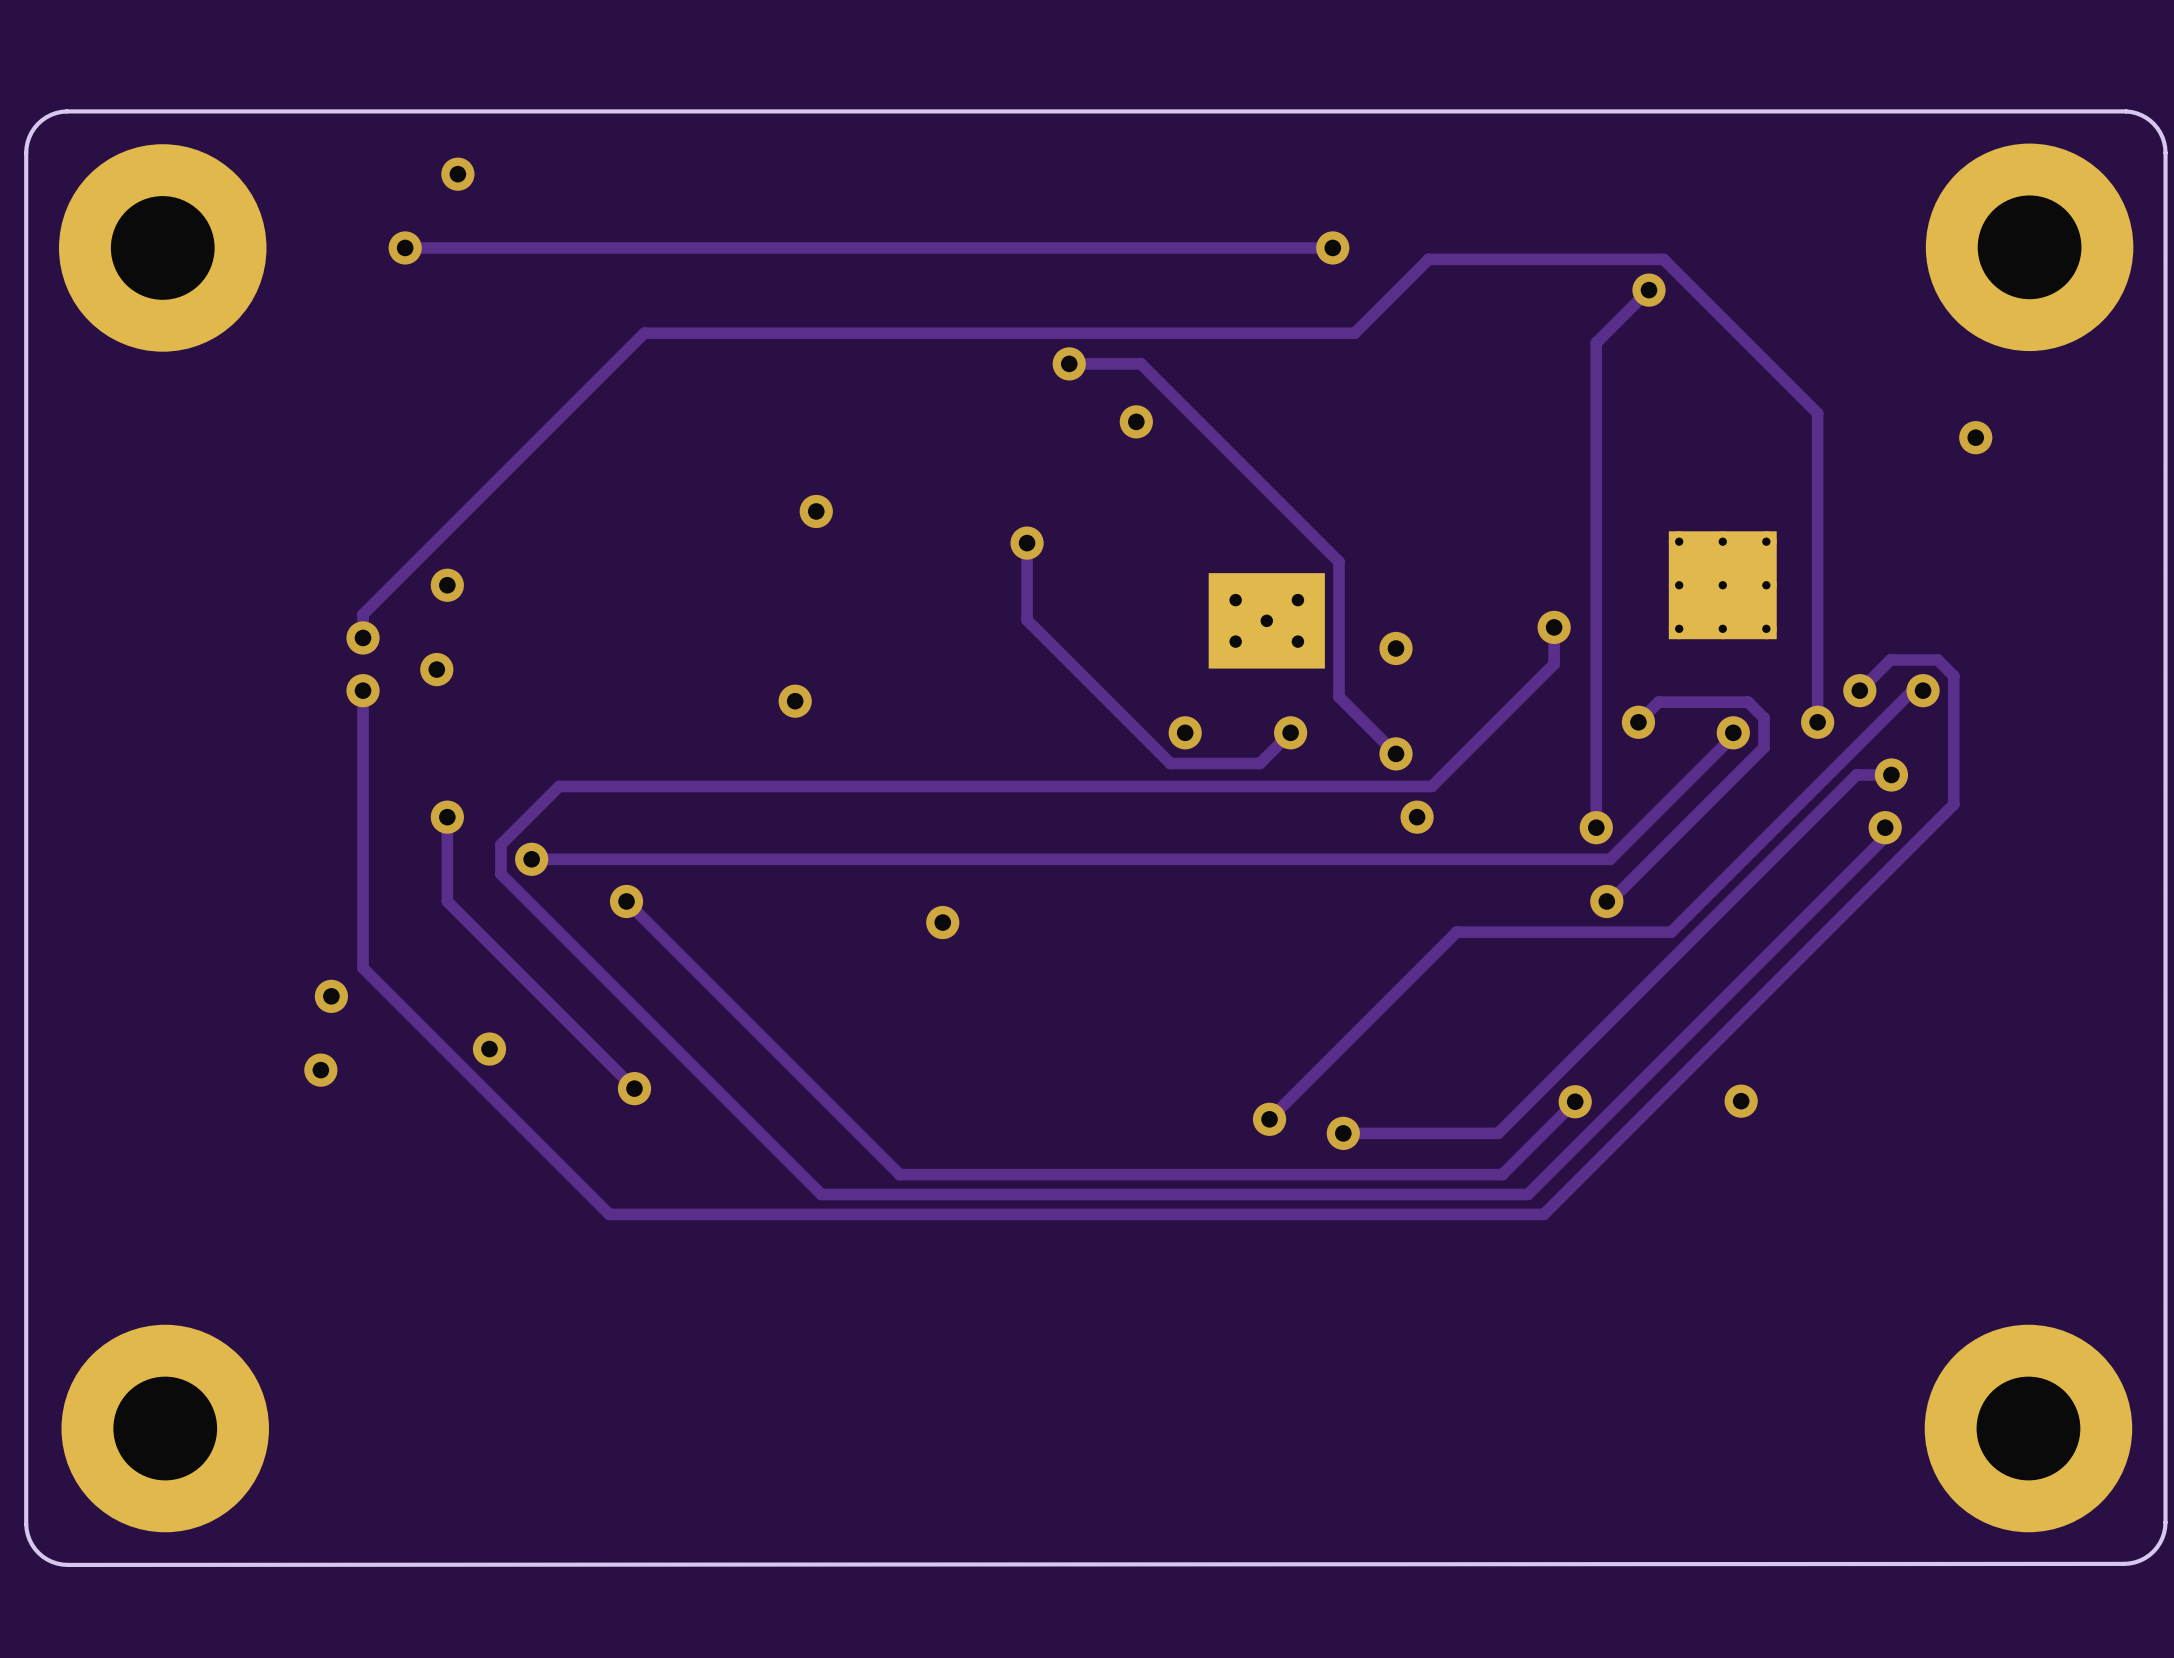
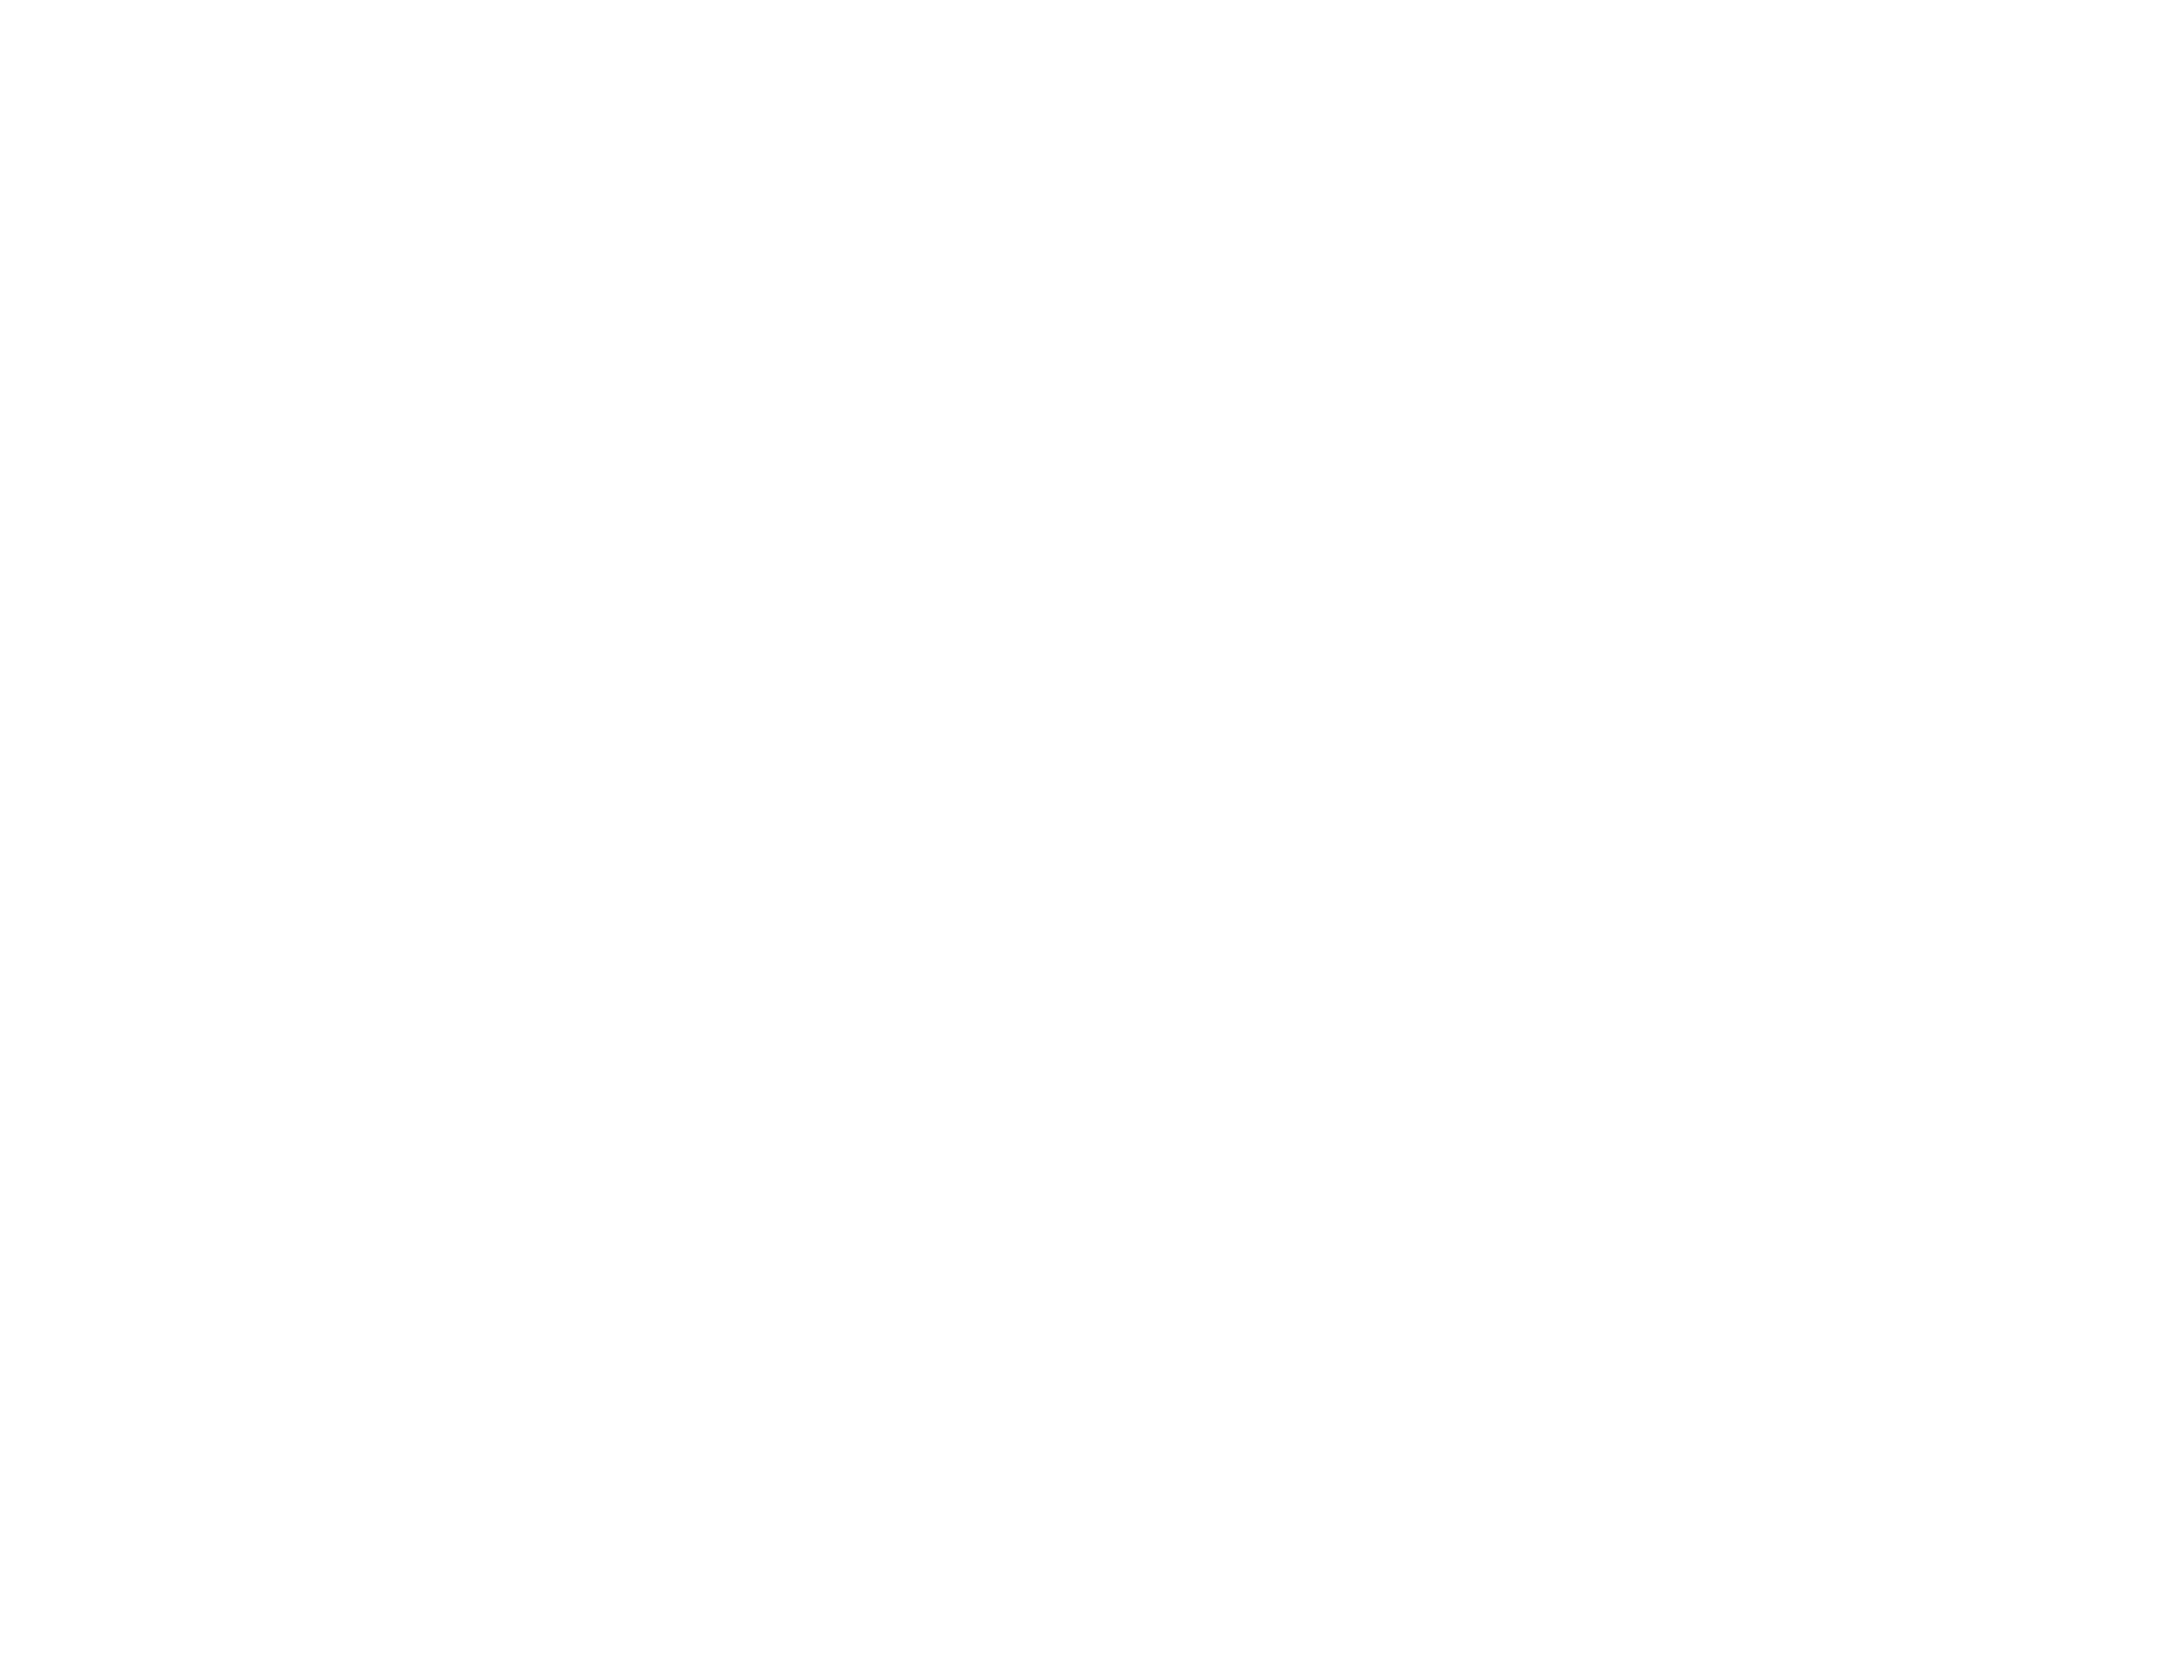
board edge: (2126, 111) (66, 111) (46, 117) (31, 132) (26, 152) (26, 1524) (32, 1544) (47, 1559) (67, 1564) (2123, 1563) (2139, 1560) (2149, 1555) (2159, 1543) (2165, 1522) (2165, 152) (2162, 137) (2154, 124) (2141, 115) (2126, 111) -> none
via: (457, 174) -> none
part: (162, 247) -> none
via: (405, 247) -> none
track: (1332, 247) (405, 247) -> none
via: (1332, 247) -> none
part: (2029, 247) -> none
track: (1648, 290) (1596, 342) (1596, 827) -> none
via: (1648, 290) -> none
track: (1069, 363) (1141, 363) (1338, 561) (1338, 696) (1396, 753) -> none
via: (1069, 363) -> none
via: (1136, 421) -> none
via: (1975, 437) -> none
via: (816, 511) -> none
track: (1027, 543) (1027, 620) (1170, 763) (1259, 763) (1290, 732) -> none
via: (1027, 543) -> none
via: (447, 585) -> none
part: (1722, 585) -> none
part: (1266, 620) -> none
track: (1554, 627) (1554, 664) (1431, 786) (559, 786) (500, 844) (500, 874) (821, 1194) (1527, 1194) (1885, 837) (1885, 827) -> none
via: (1554, 627) -> none
track: (363, 637) (363, 614) (644, 333) (1354, 333) (1428, 259) (1663, 259) (1817, 413) (1817, 722) -> none
via: (363, 637) -> none
via: (1396, 648) -> none
via: (436, 669) -> none
via: (363, 690) -> none
track: (1859, 690) (1890, 659) (1937, 659) (1953, 675) (1953, 804) (1543, 1214) (609, 1214) (363, 967) (363, 690) -> none
via: (1859, 690) -> none
track: (1923, 690) (1912, 690) (1671, 932) (1456, 932) (1269, 1119) -> none
via: (1923, 690) -> none
via: (795, 701) -> none
track: (1638, 722) (1658, 702) (1748, 702) (1764, 718) (1764, 747) (1610, 901) (1606, 901) -> none
via: (1638, 722) -> none
via: (1817, 722) -> none
via: (1185, 732) -> none
via: (1290, 732) -> none
track: (1733, 732) (1733, 736) (1610, 859) (531, 859) -> none
via: (1733, 732) -> none
via: (1396, 753) -> none
track: (1891, 774) (1856, 774) (1498, 1133) (1343, 1133) -> none
via: (1891, 774) -> none
track: (447, 817) (447, 901) (634, 1088) -> none
via: (447, 817) -> none
via: (1417, 817) -> none
via: (1596, 827) -> none
via: (1885, 827) -> none
via: (531, 859) -> none
track: (626, 901) (899, 1174) (1502, 1174) (1575, 1101) -> none
via: (626, 901) -> none
via: (1606, 901) -> none
via: (942, 922) -> none
via: (331, 996) -> none
via: (489, 1049) -> none
via: (320, 1070) -> none
via: (634, 1088) -> none
via: (1575, 1101) -> none
via: (1741, 1101) -> none
via: (1269, 1119) -> none
via: (1343, 1133) -> none
part: (165, 1428) -> none
part: (2028, 1428) -> none

